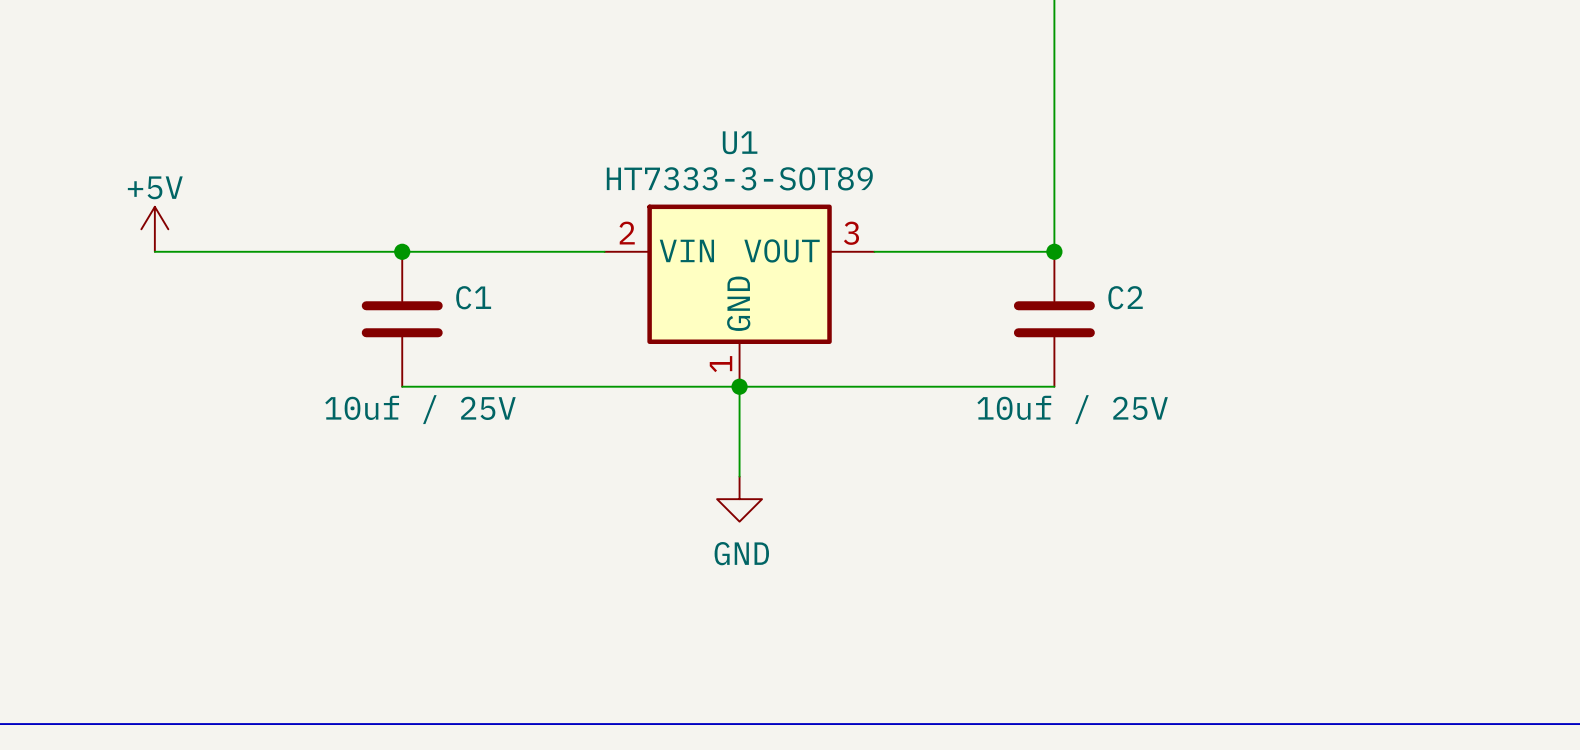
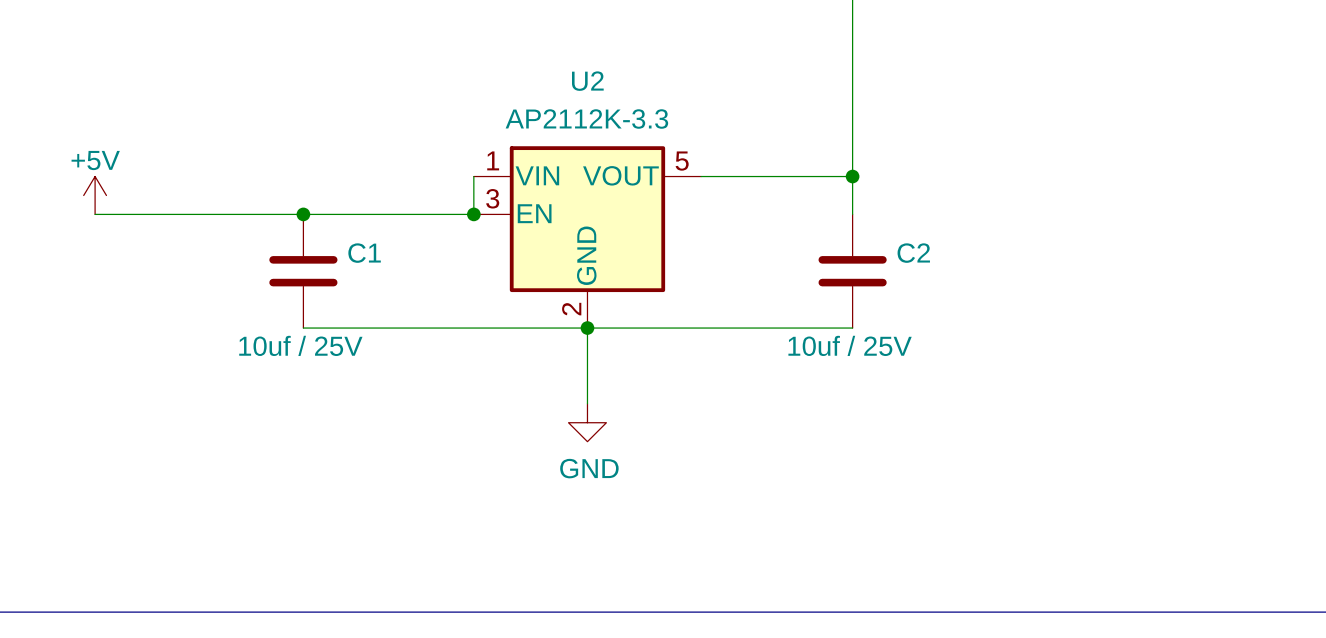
wire: none -> (473, 176) (473, 214)
junction: none -> (473, 214)
wire: (874, 251) (1054, 251) -> (701, 176) (852, 176)
junction position: (1054, 251) -> (852, 176)
U2: none -> AP2112K-3.3 (587, 237)
U1: HT7333-3-SOT89 (739, 295) -> none

